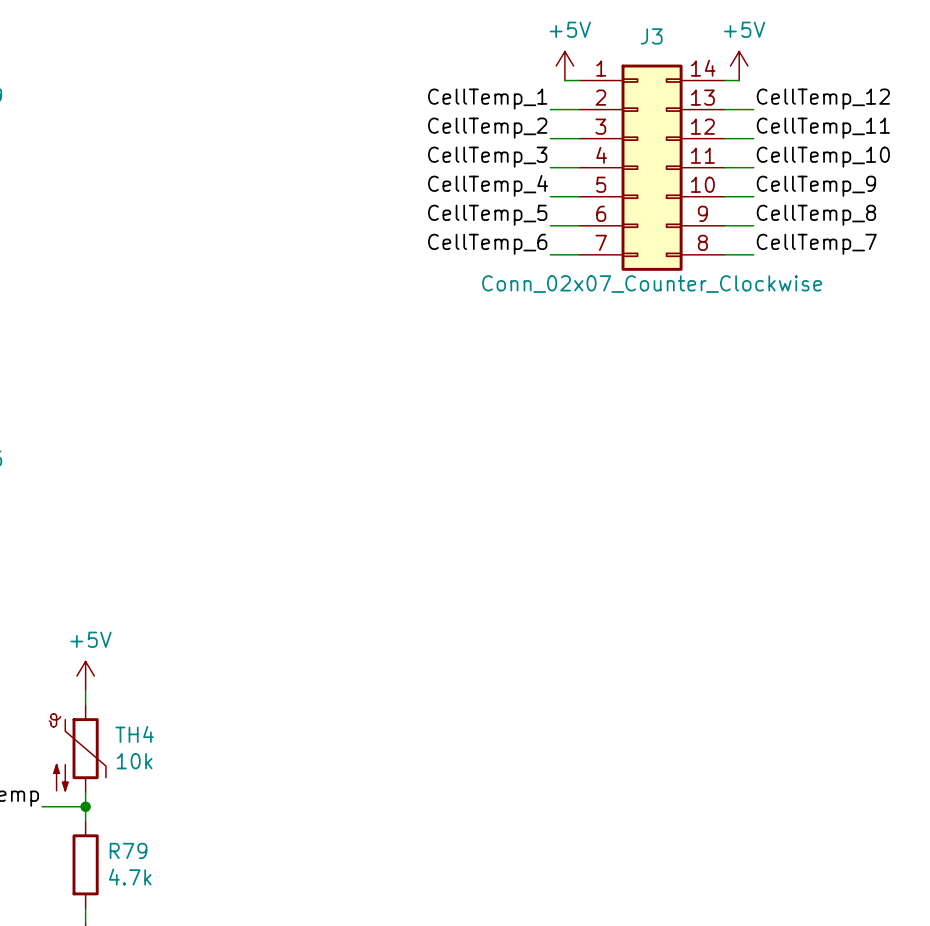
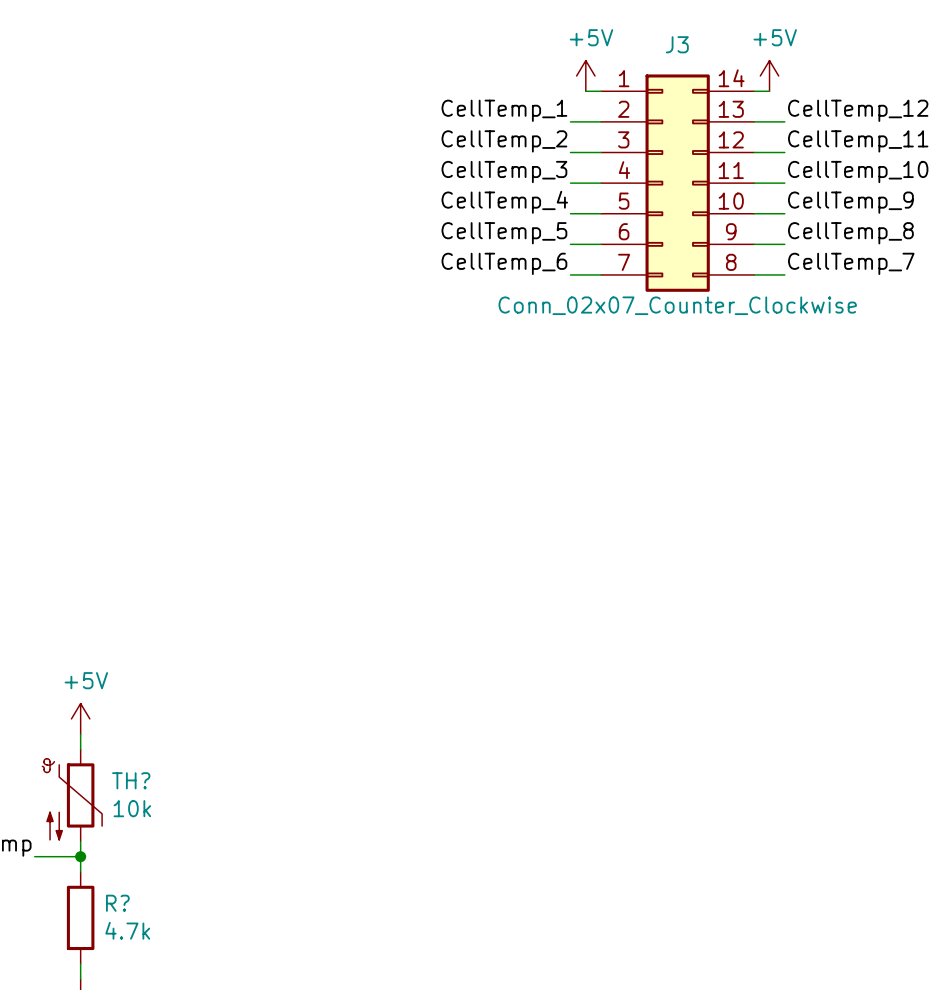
TH4 name: TH4 (134, 734) -> TH? (131, 780)
R79 name: R79 (128, 850) -> R? (117, 903)

